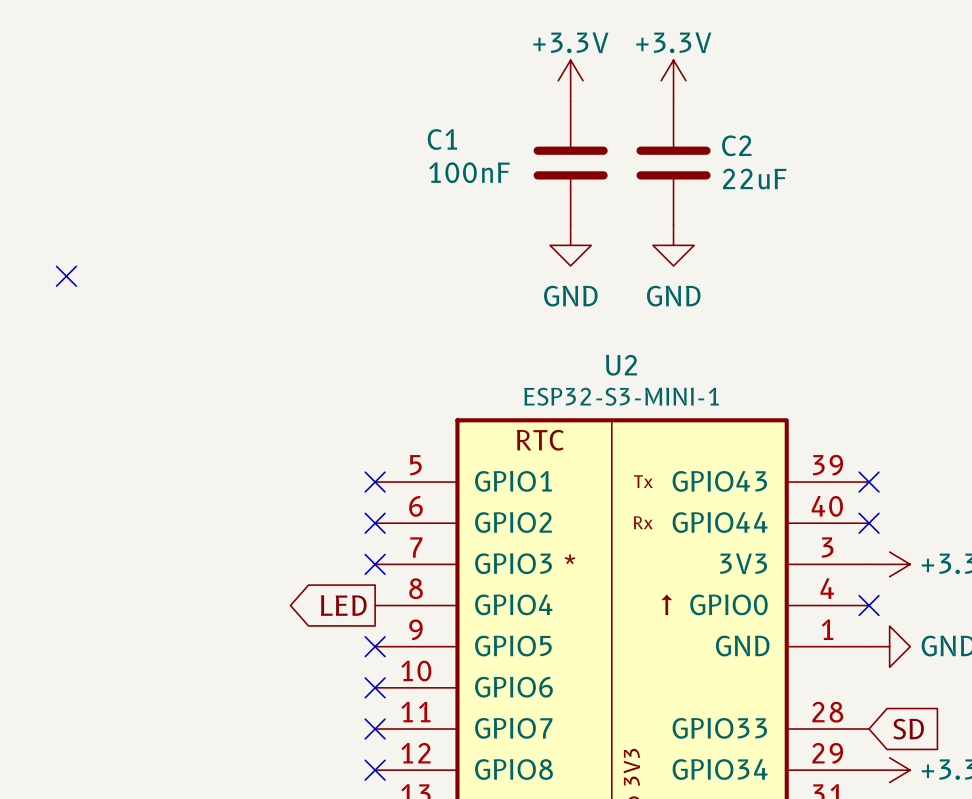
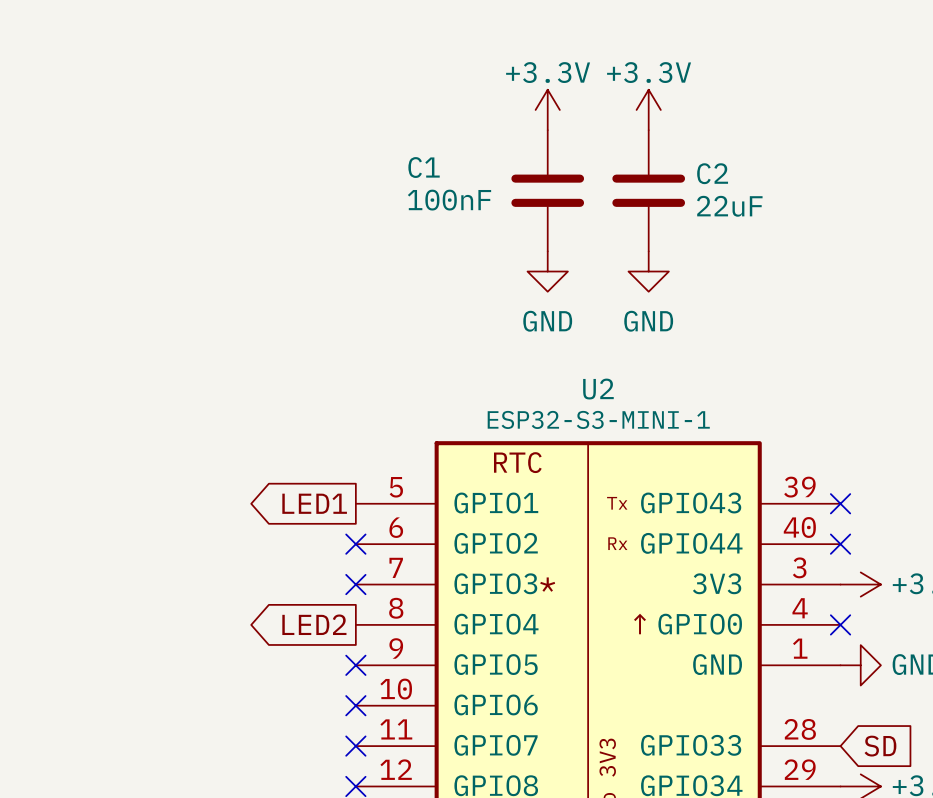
no-connect mark: (66, 276) -> none
global label: none -> LED1 (314, 503)
no-connect mark: (375, 482) -> none
global label: LED (343, 605) -> LED2 (314, 624)

